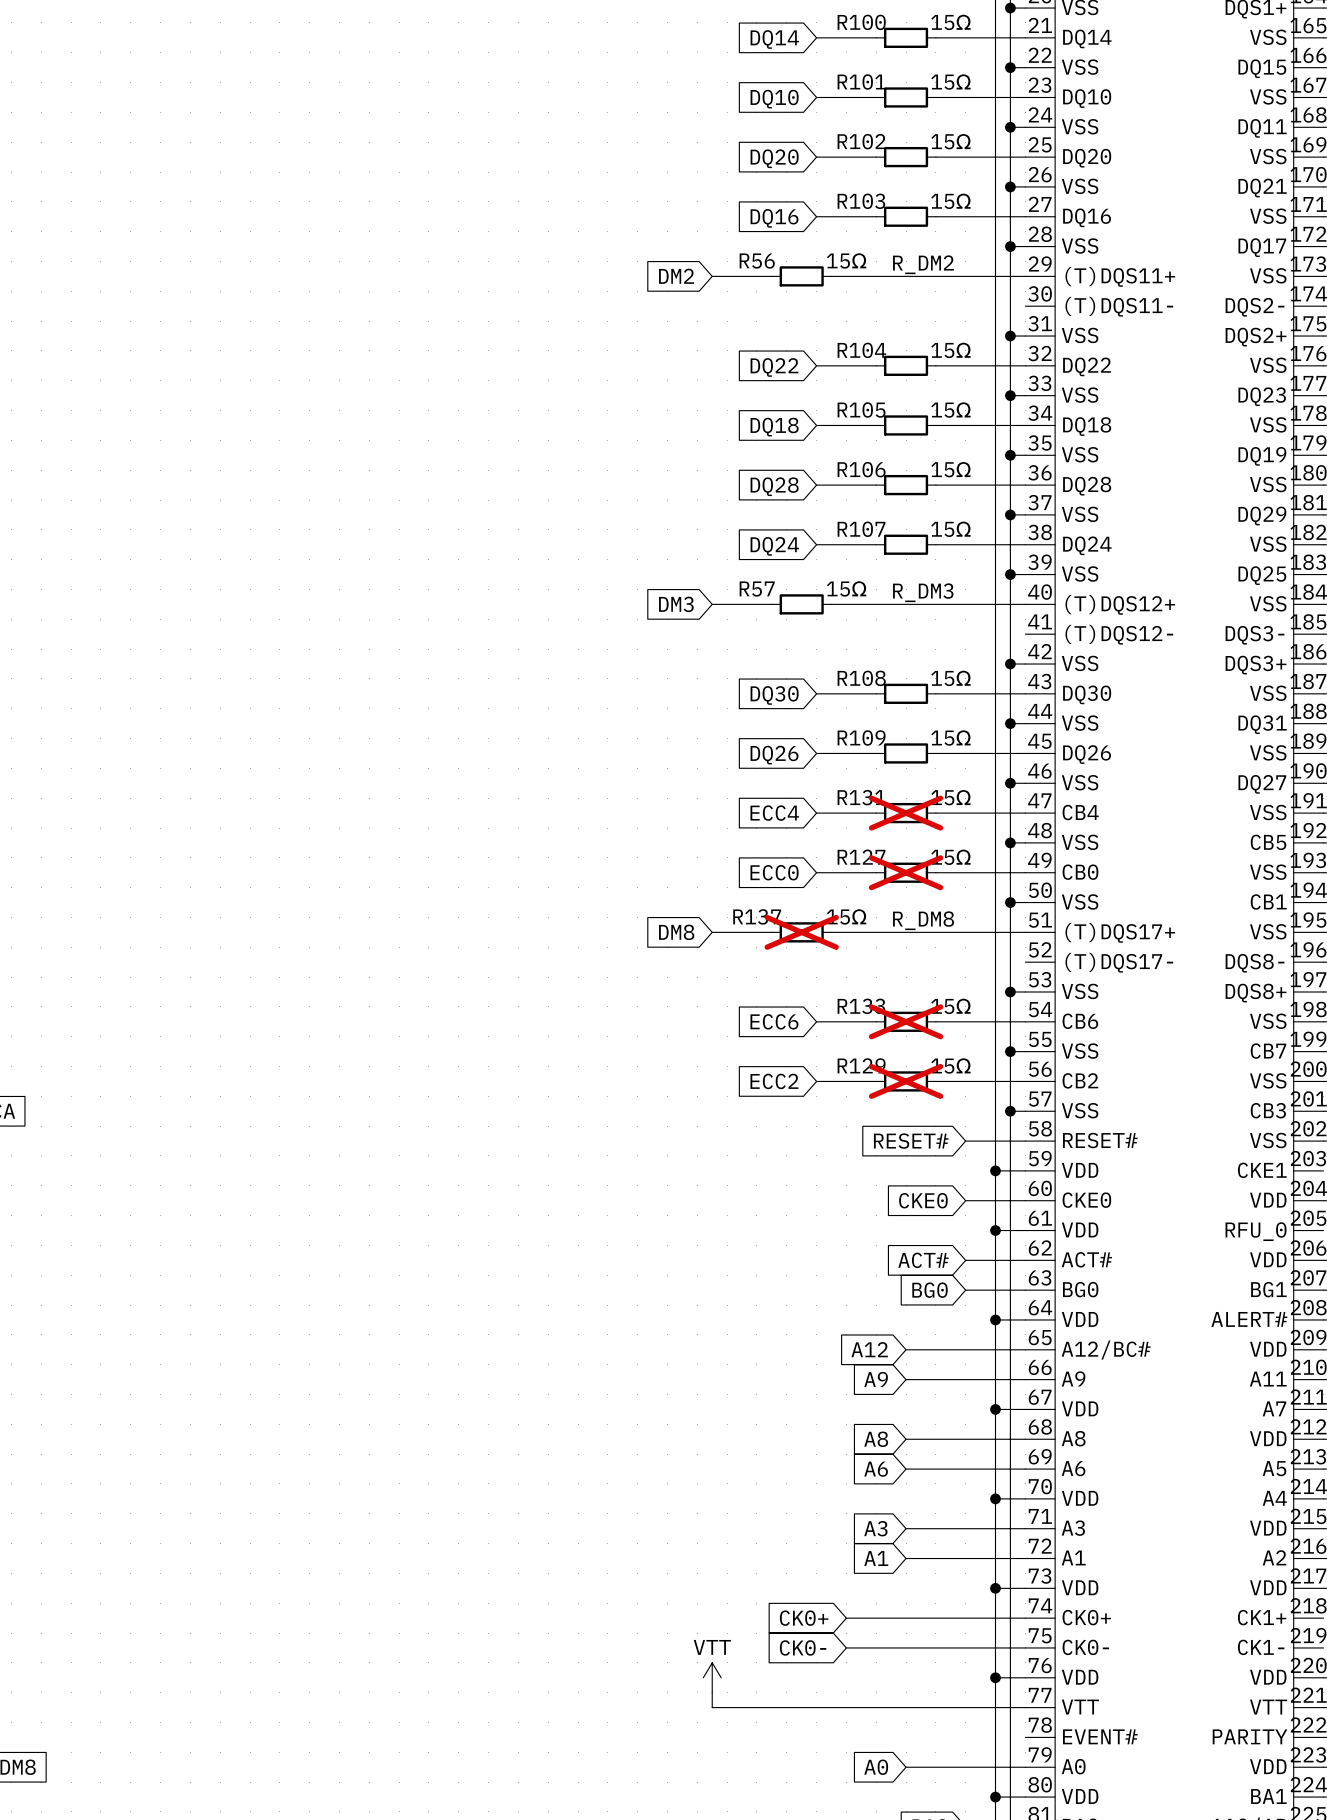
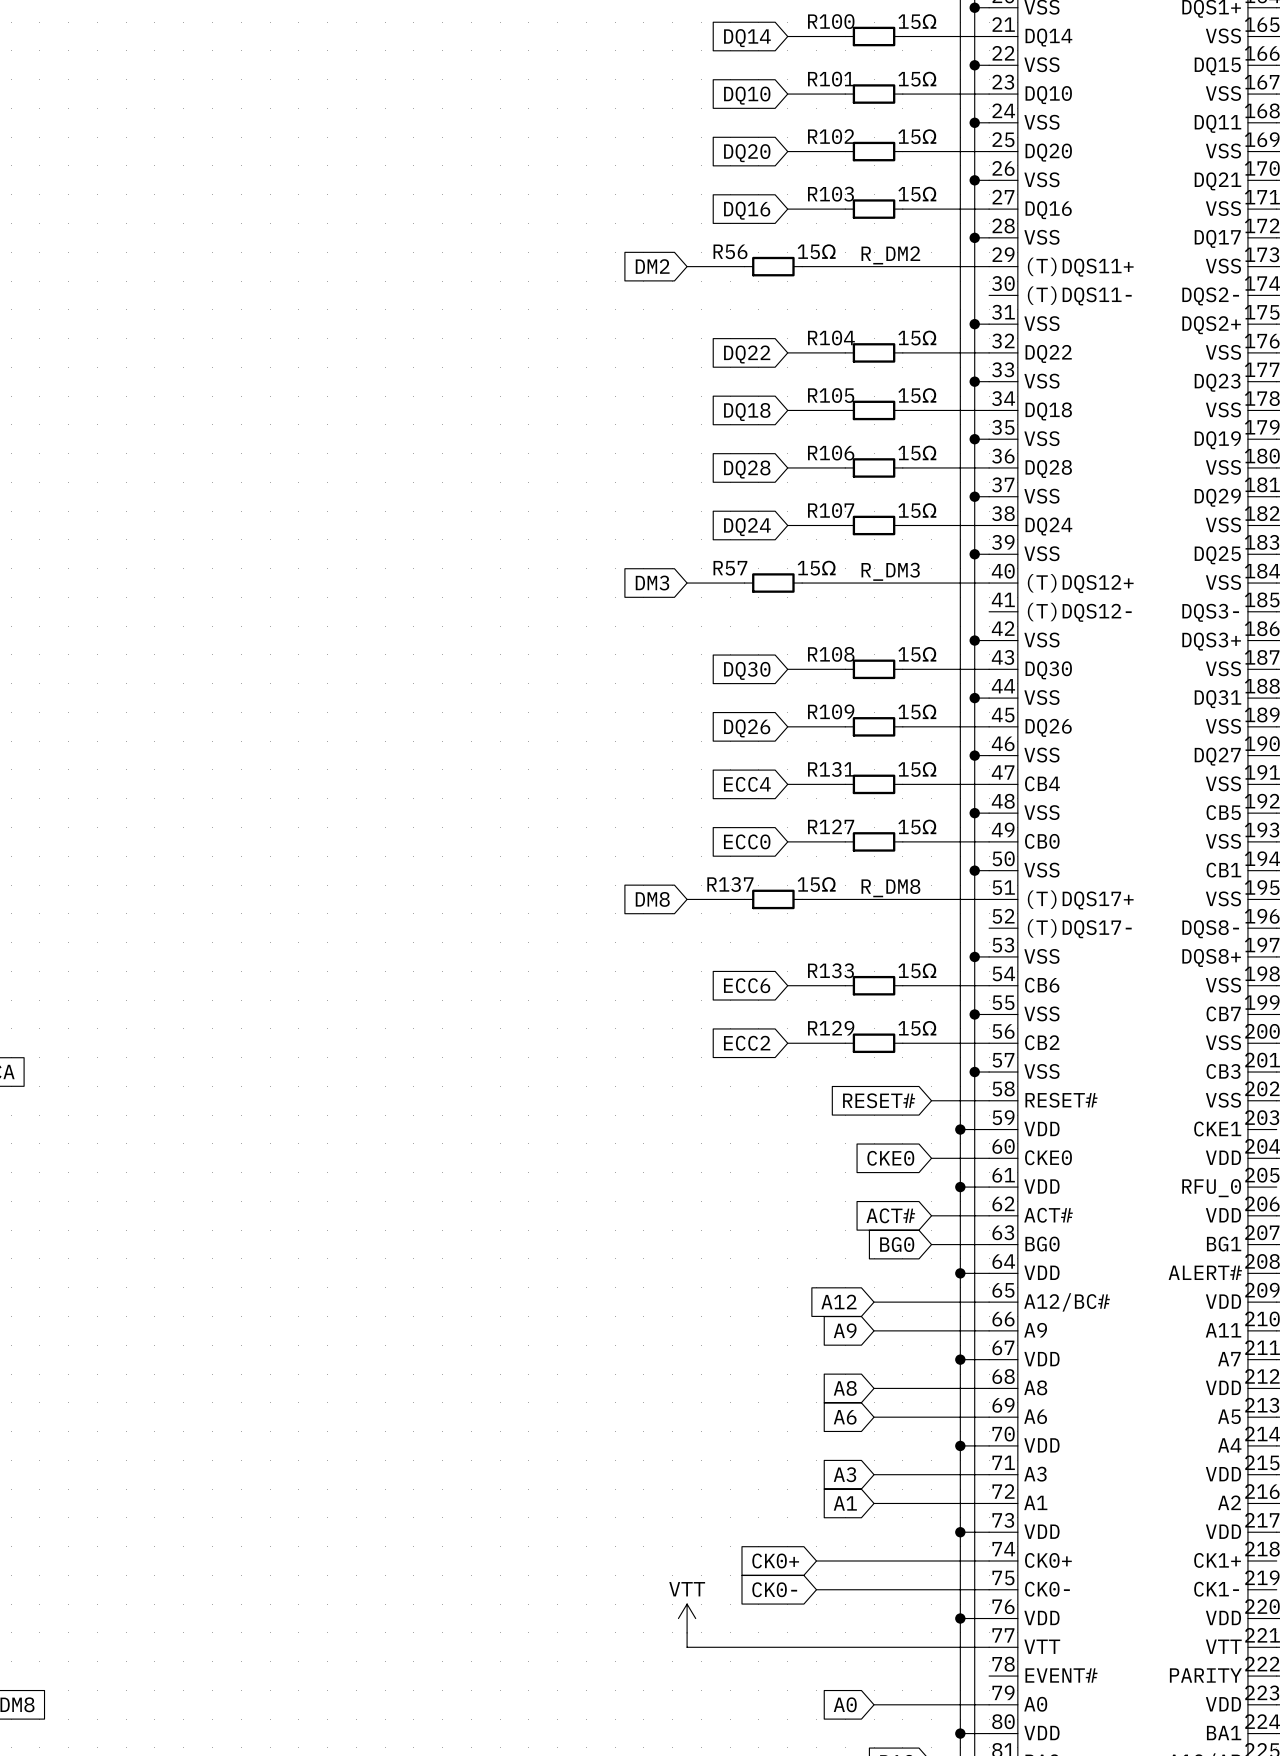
R131 do-not-place cross: (906, 813) -> none
R127 do-not-place cross: (906, 872) -> none
R137 do-not-place cross: (801, 932) -> none
R133 do-not-place cross: (906, 1021) -> none
R129 do-not-place cross: (906, 1081) -> none

